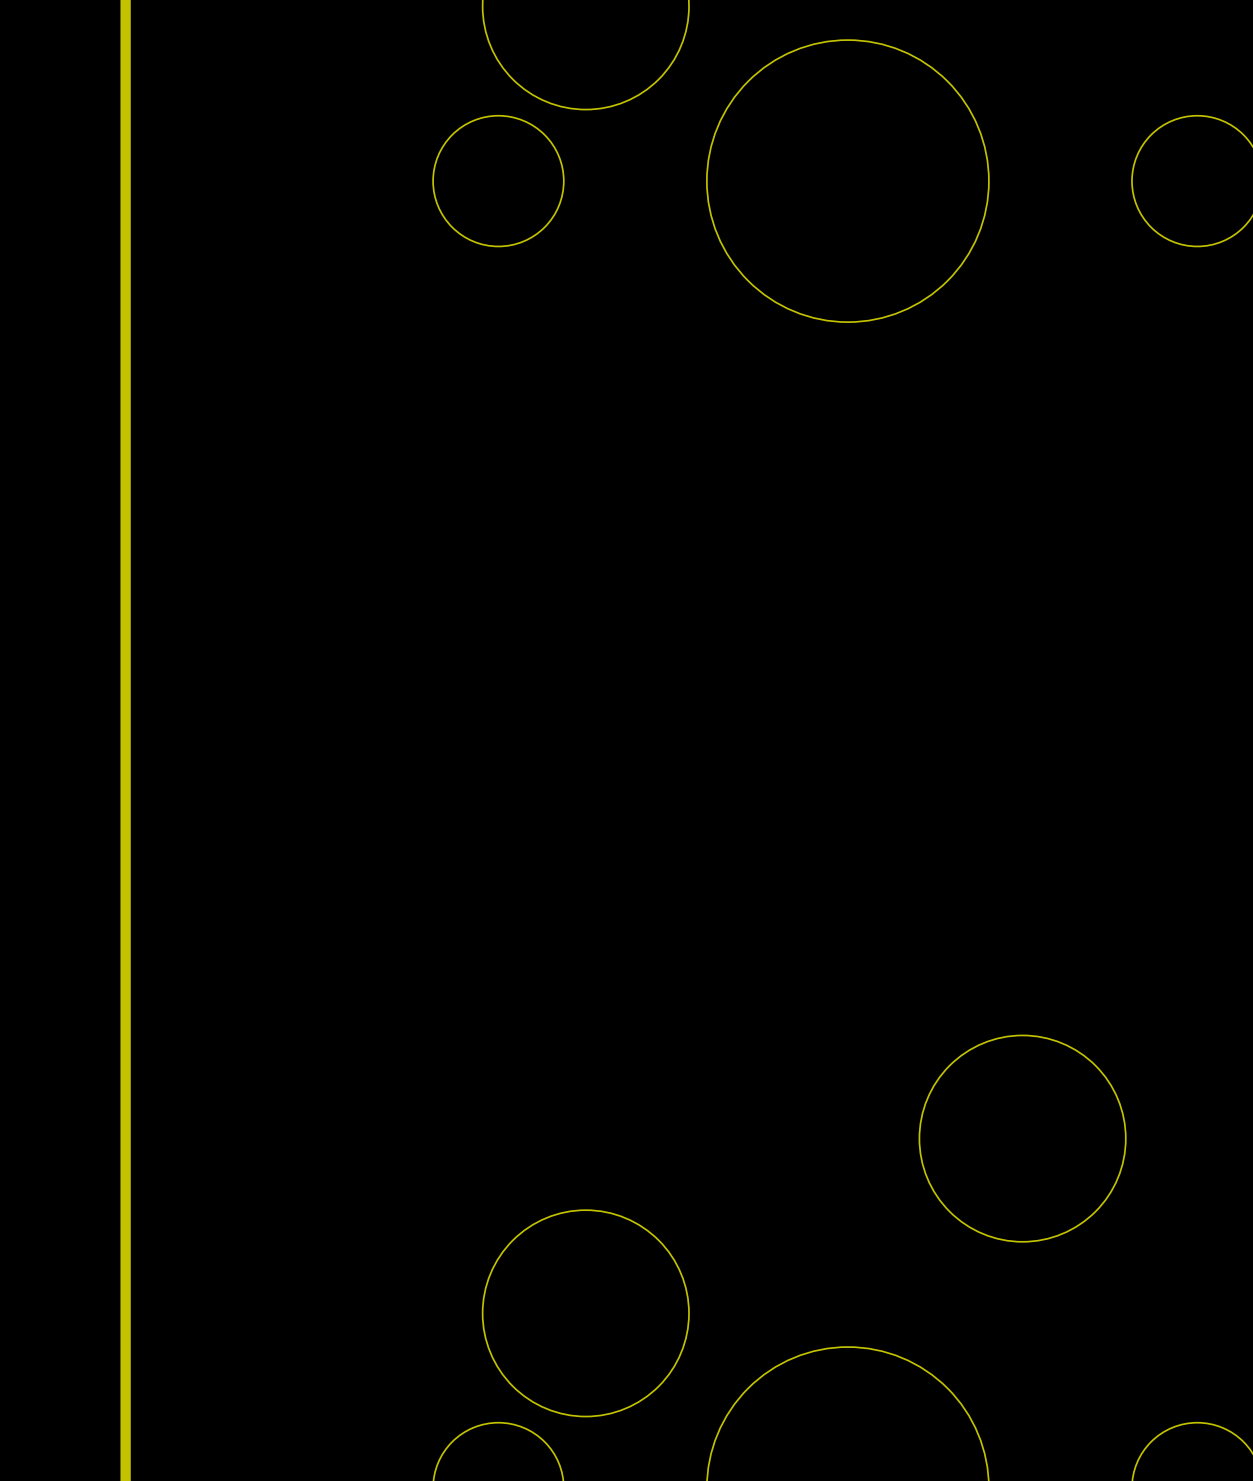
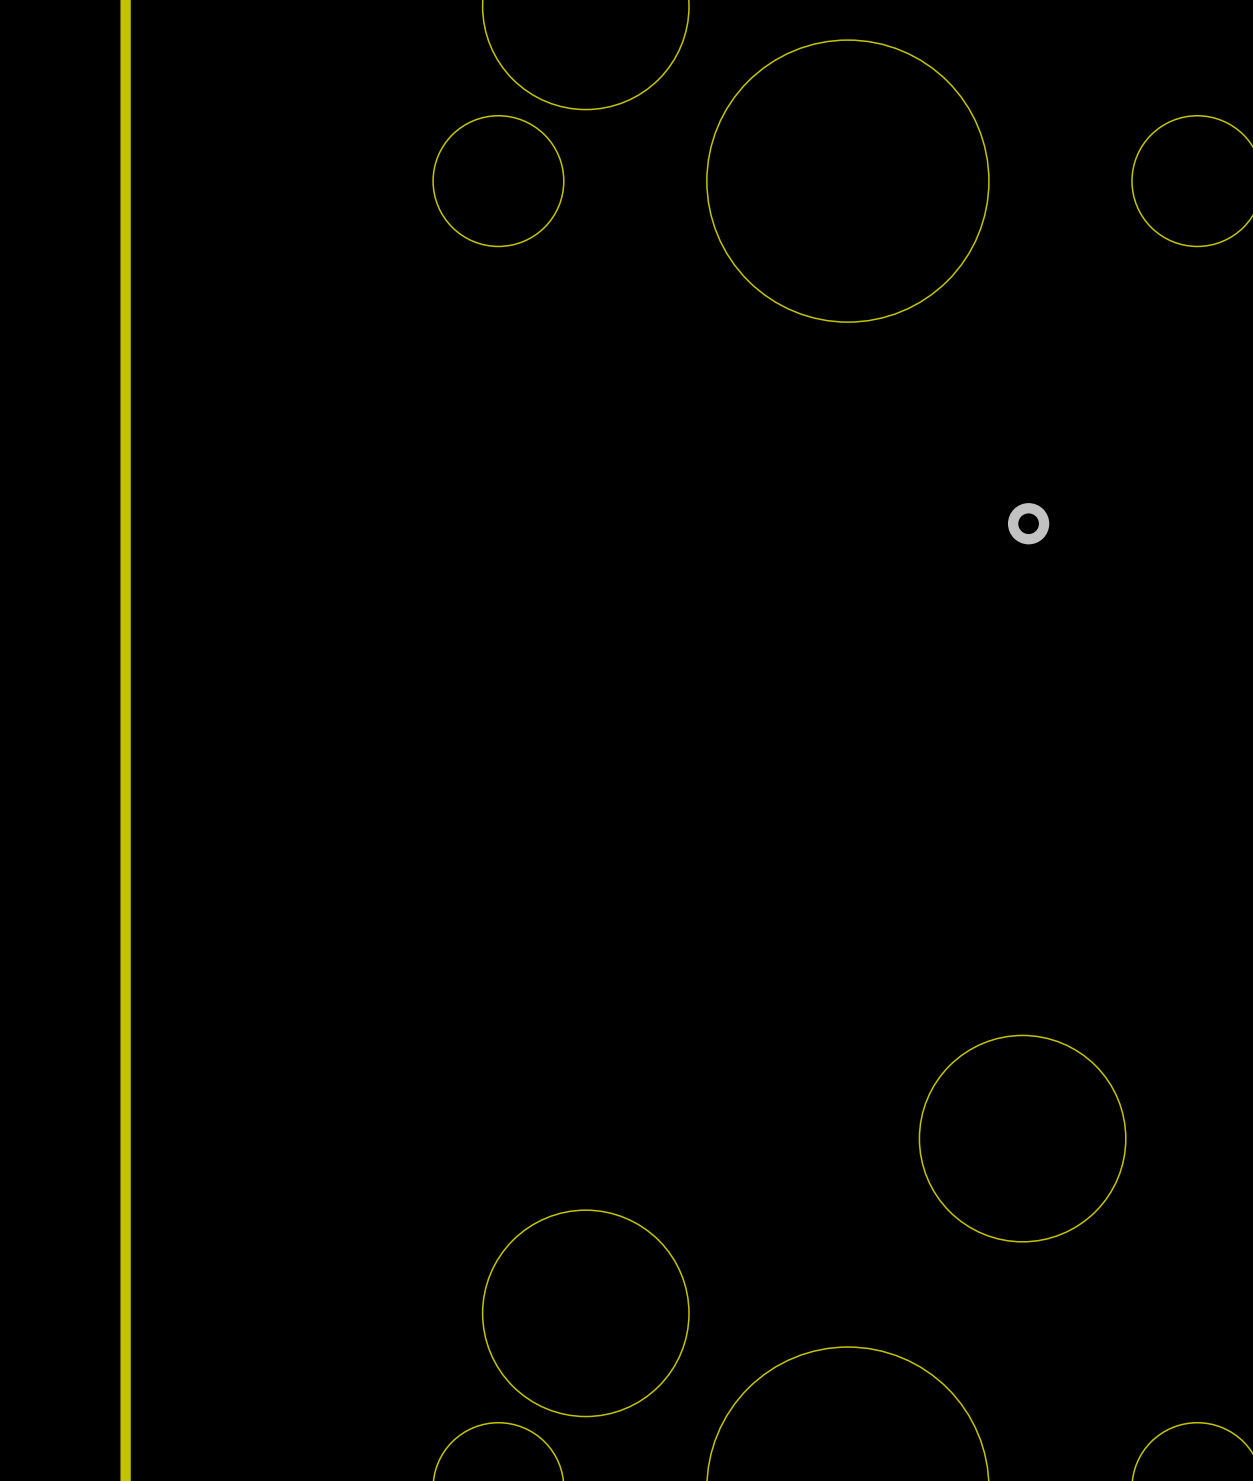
via: none -> (1028, 523)

